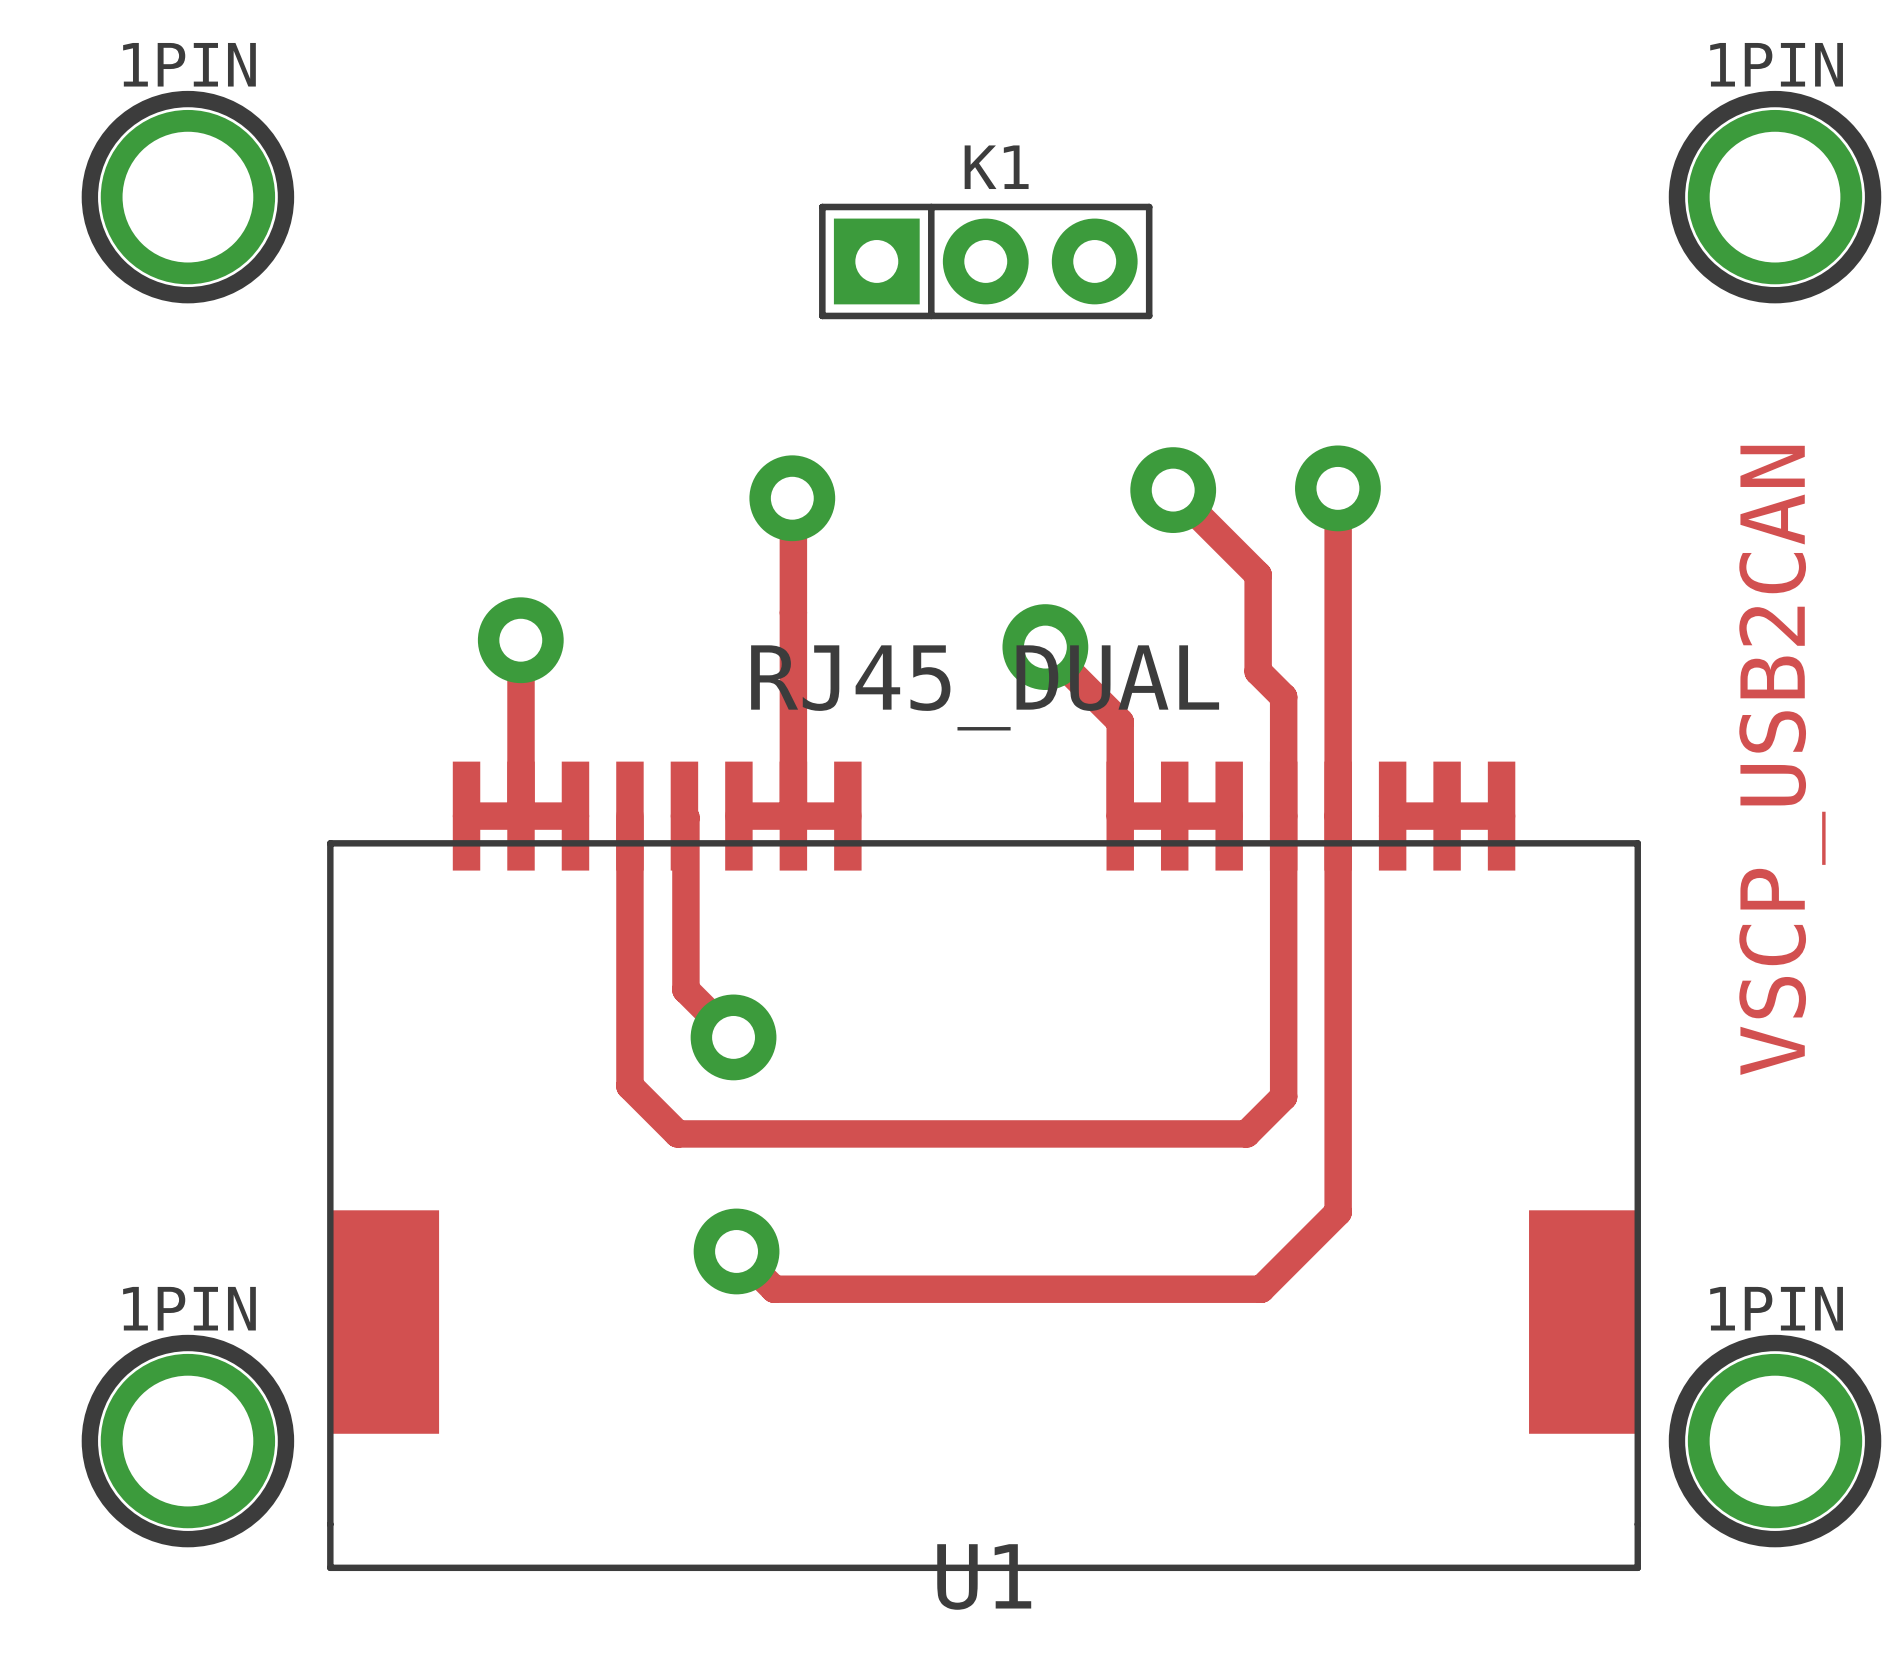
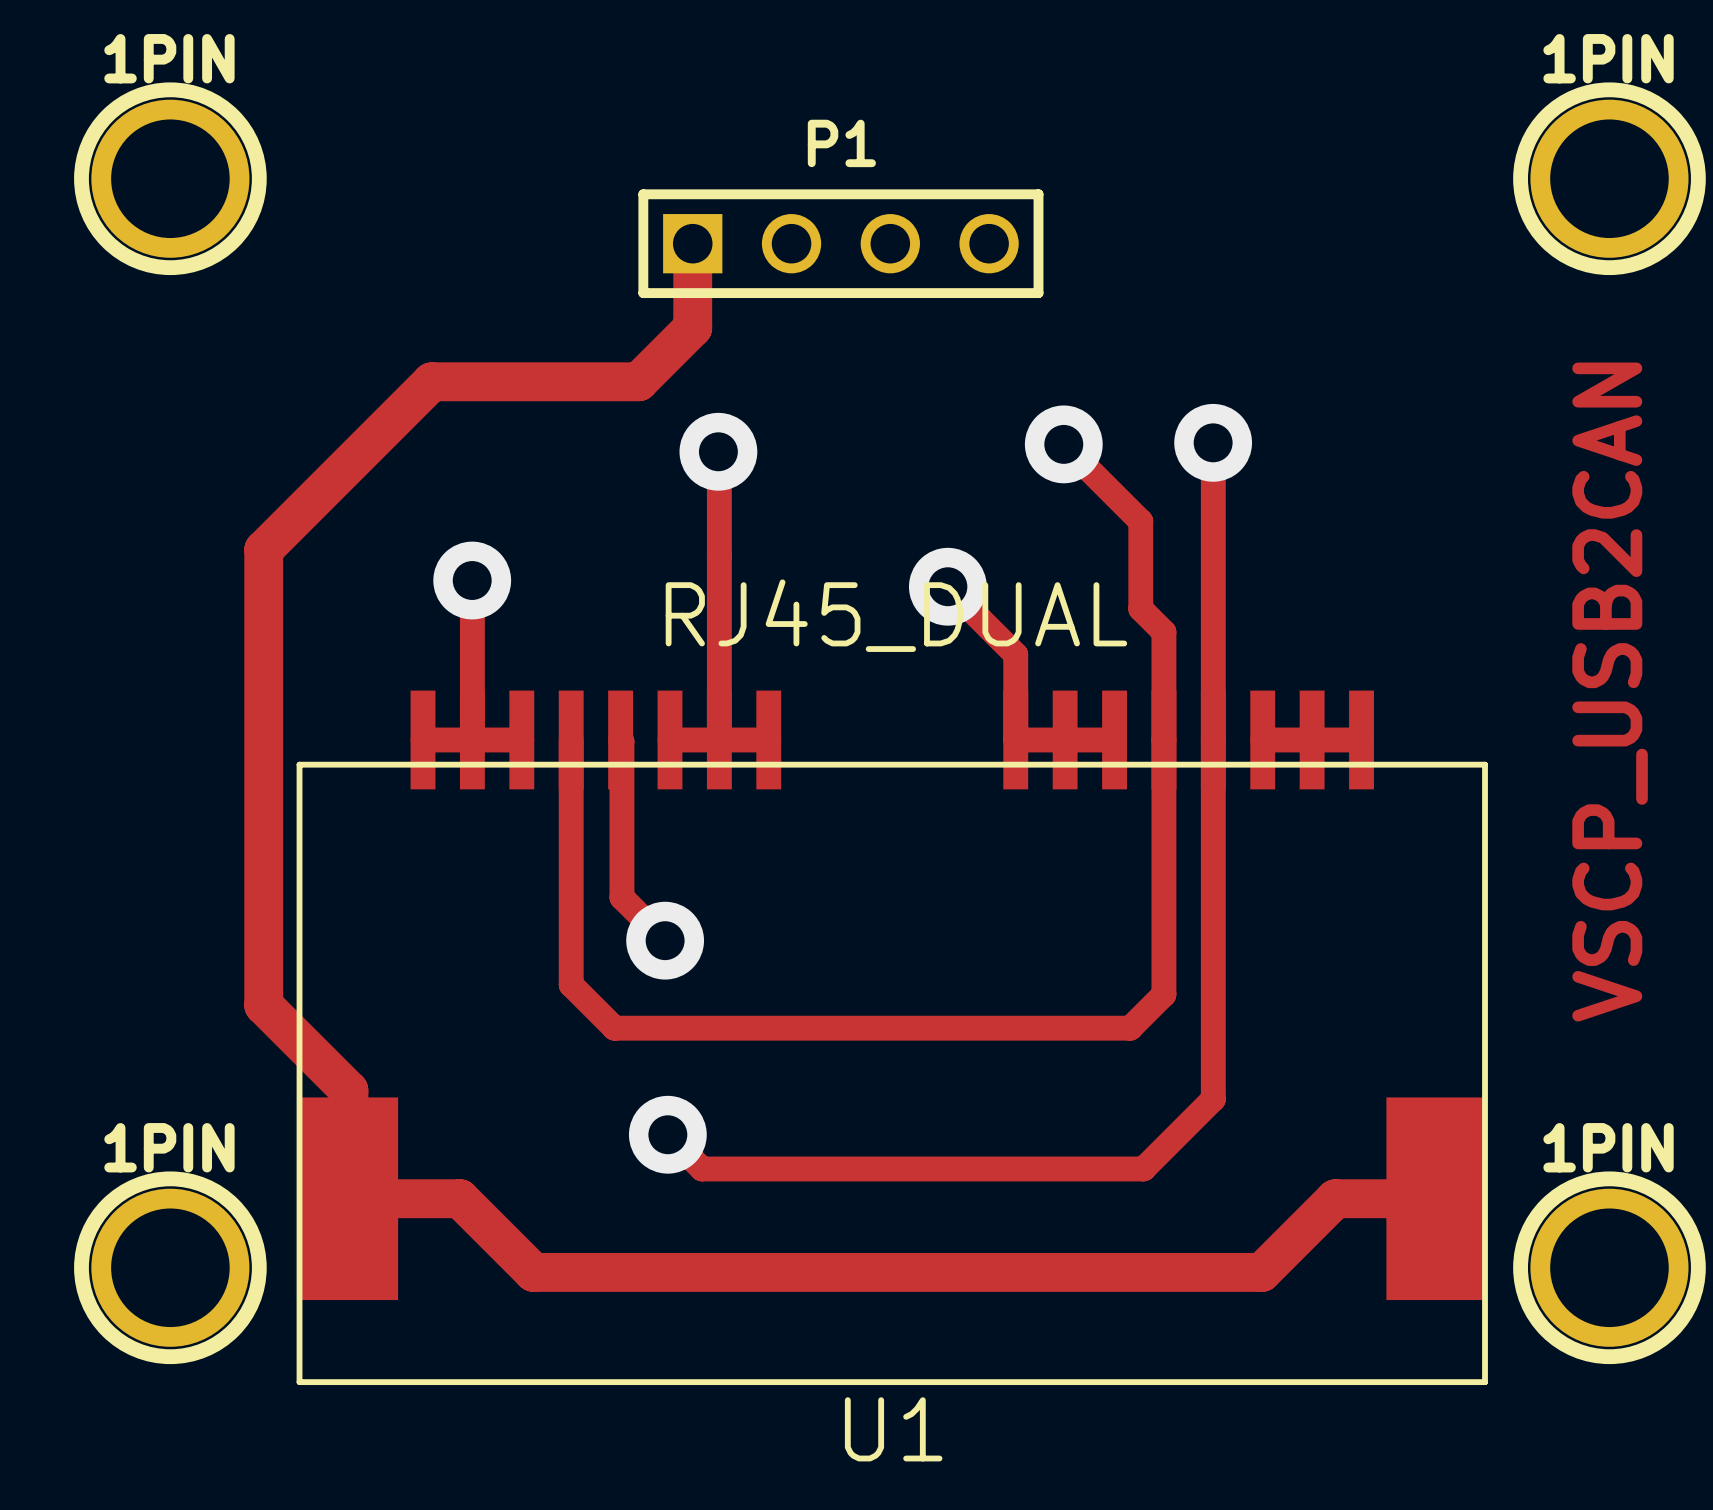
K1: (985, 261) -> none
track: none -> (692, 243) (692, 327) (638, 381) (431, 381) (263, 549) (263, 1005) (348, 1090) (348, 1198) (459, 1198) (533, 1272) (1261, 1272) (1335, 1198) (1435, 1198)
P1: none -> (840, 243)
U1 footprint: [327, 761, 1641, 1572] -> [296, 690, 1488, 1386]
1PIN position: (187, 1441) -> (170, 1267)
1PIN position: (1775, 1441) -> (1609, 1267)

